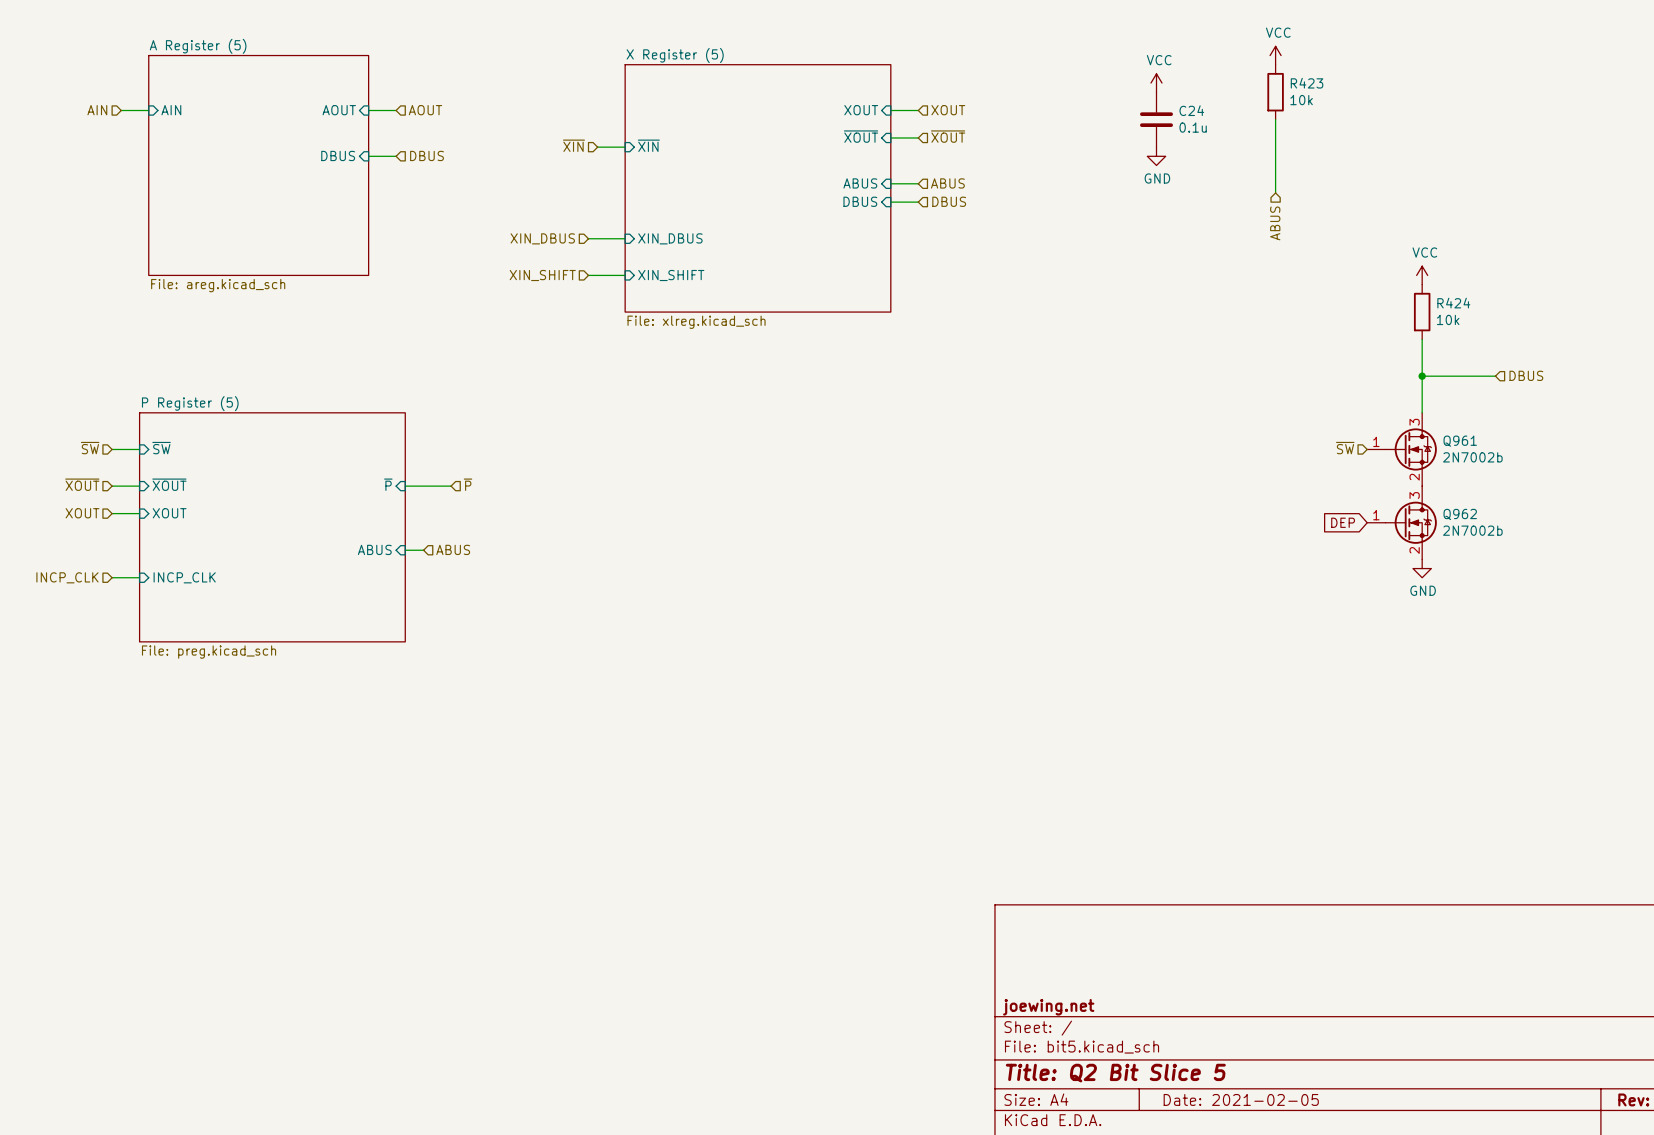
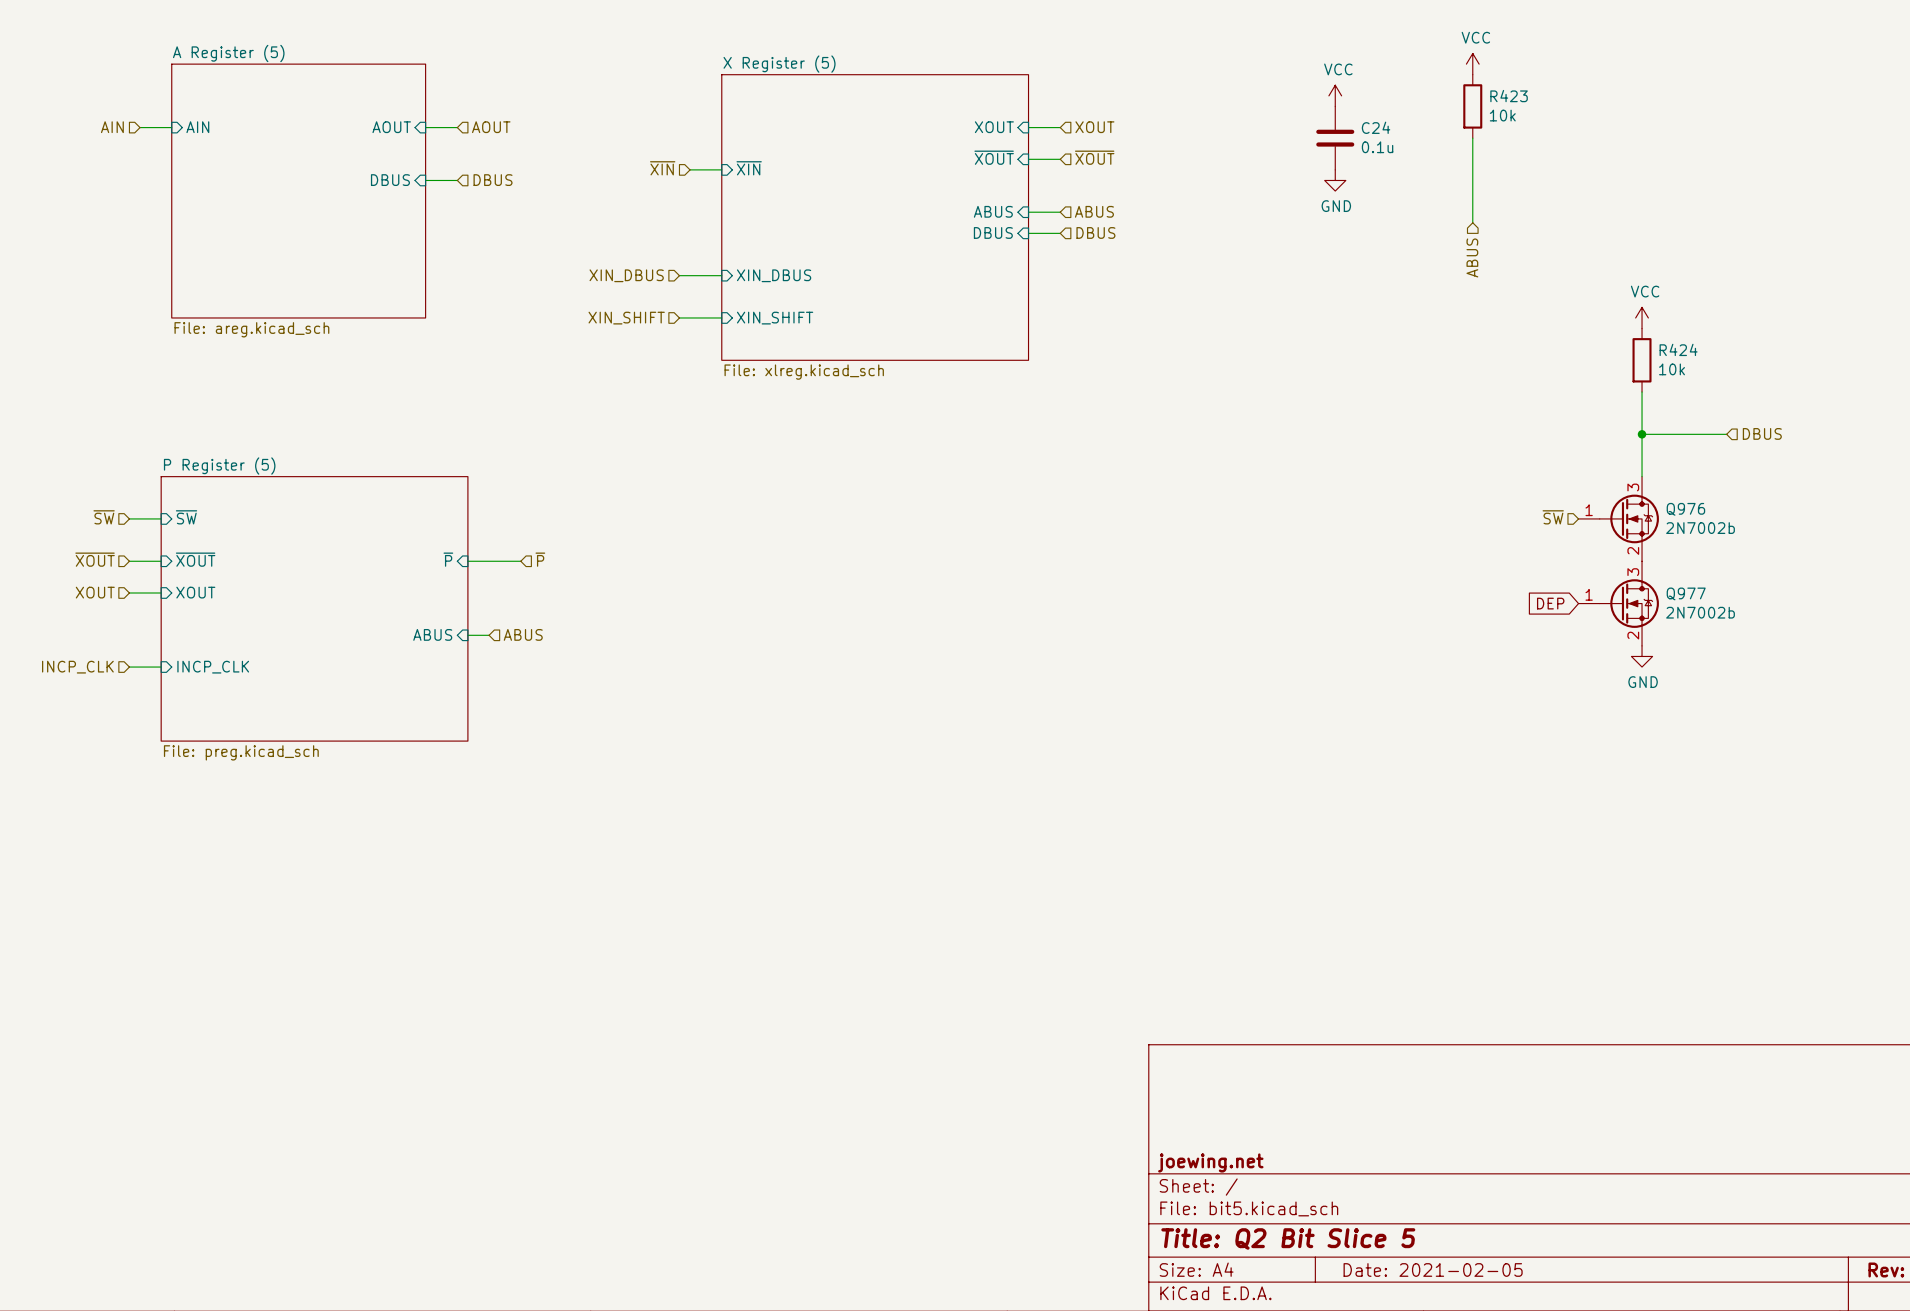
Q961 name: Q961 (1460, 441) -> Q976 (1685, 509)
Q962 name: Q962 (1460, 514) -> Q977 (1686, 593)

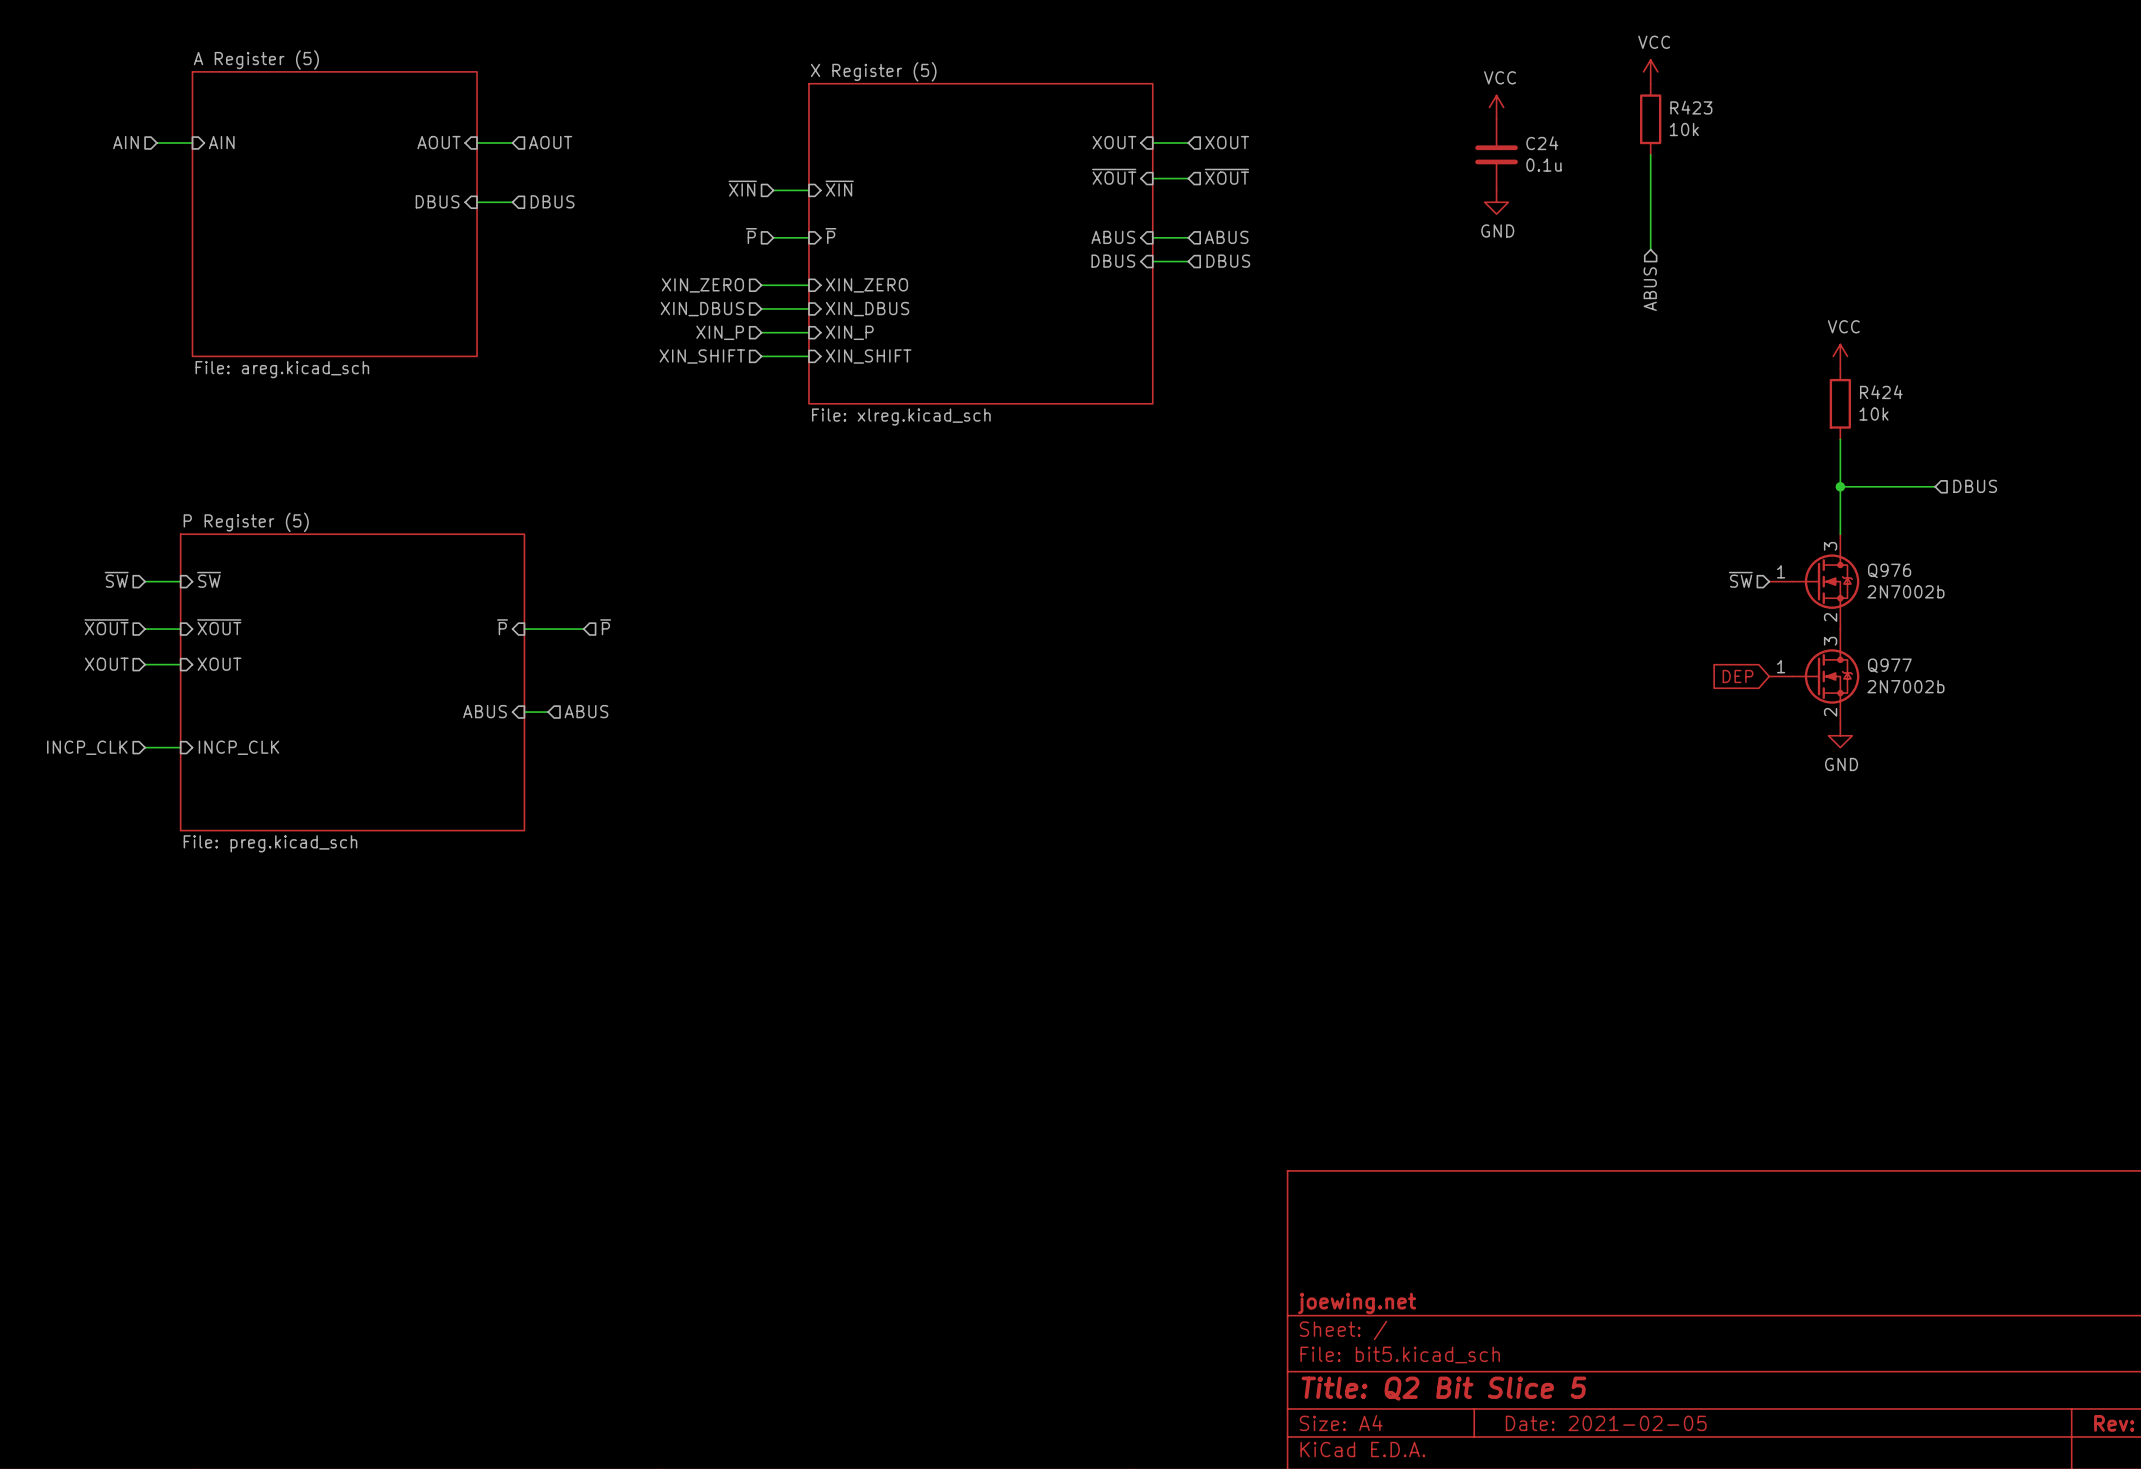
hierarchical label: none -> ~{P} (751, 236)
sheet pin: none -> ~{P} (830, 236)
wire: none -> (773, 237) (808, 237)
hierarchical label: none -> XIN_ZERO (702, 285)
wire: none -> (761, 285) (808, 285)
sheet pin: none -> XIN_ZERO (867, 285)
hierarchical label: none -> XIN_P (720, 332)
wire: none -> (761, 332) (808, 332)
sheet pin: none -> XIN_P (849, 332)

